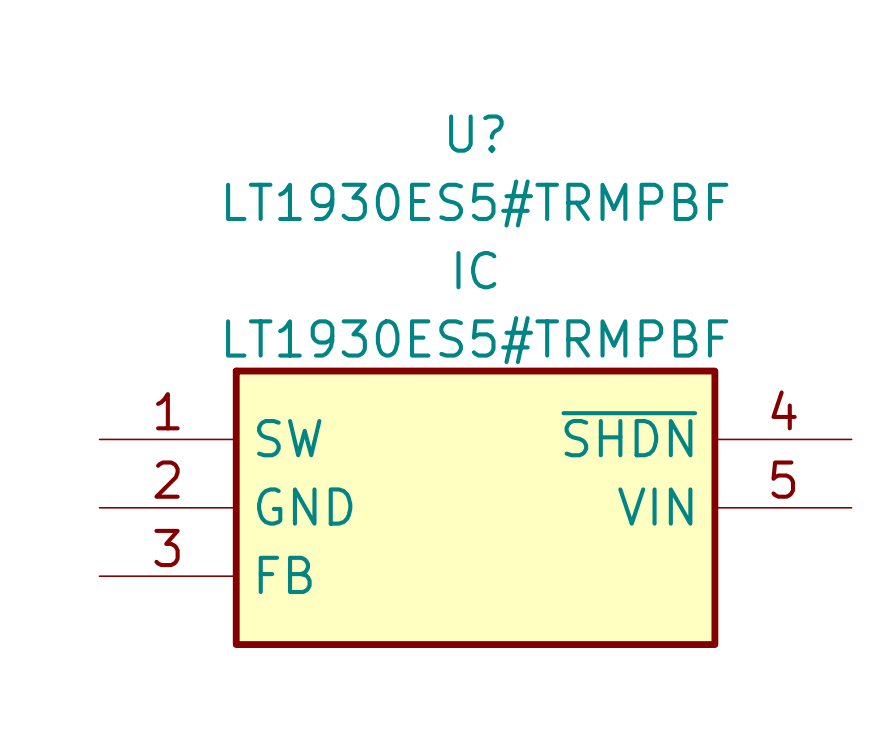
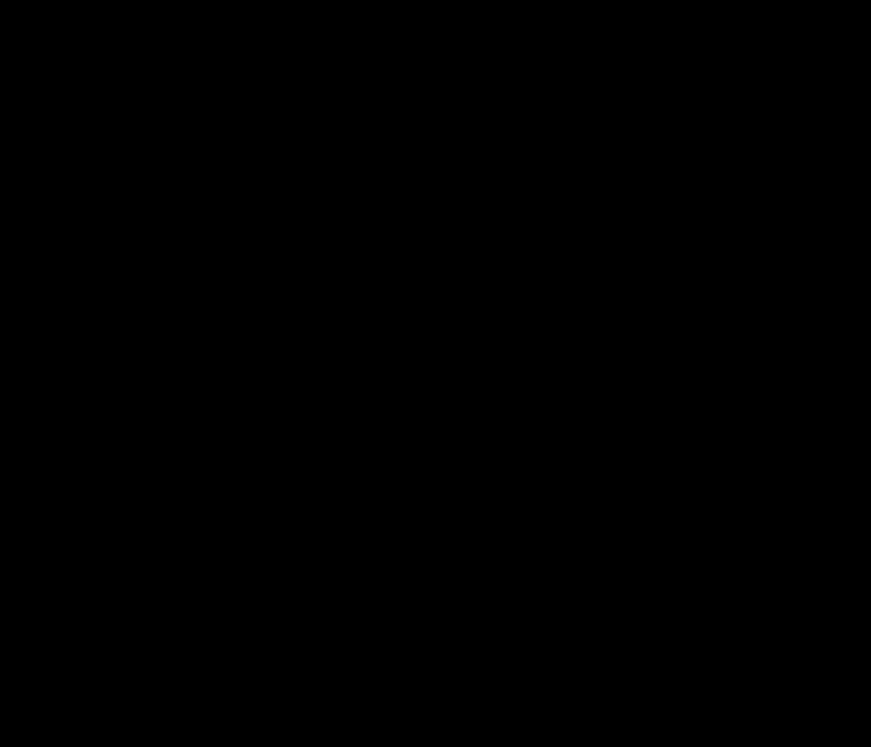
U?: LT1930ES5#TRMPBF (475, 507) -> none

